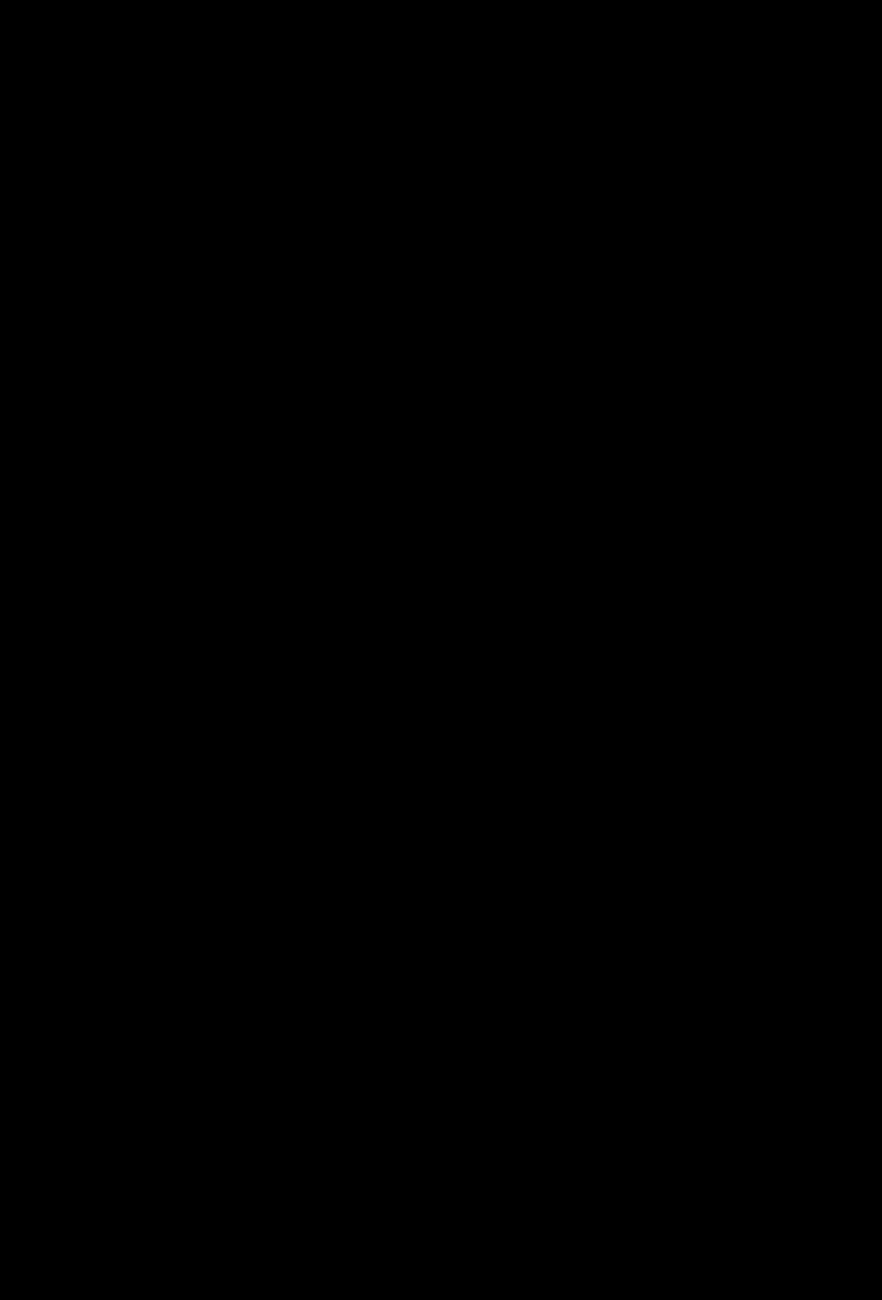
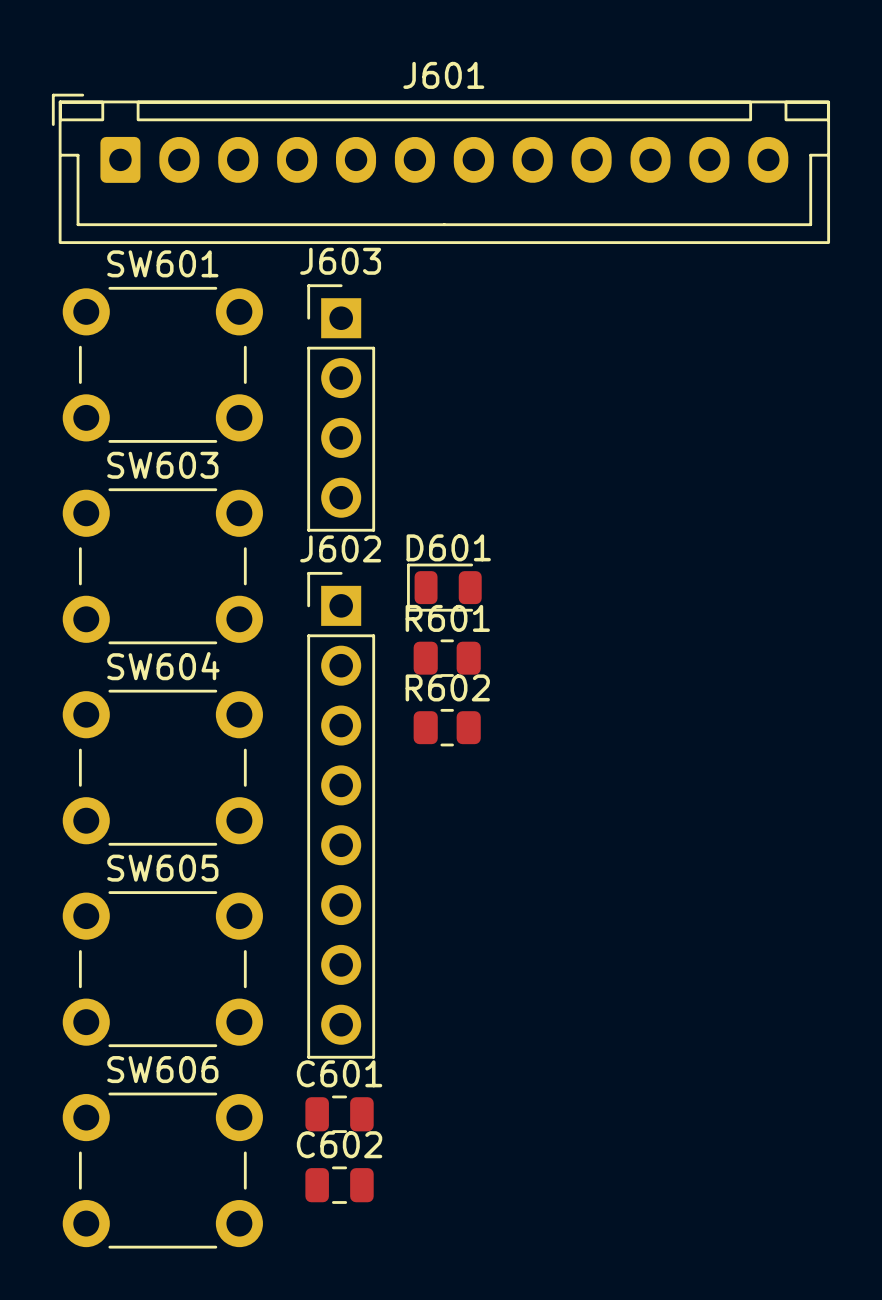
J601: none -> (440, 168)
SW601: none -> (162, 364)
J603: none -> (341, 407)
SW603: none -> (162, 566)
D601: none -> (444, 587)
R601: none -> (447, 658)
R602: none -> (447, 727)
SW604: none -> (162, 767)
J602: none -> (341, 815)
SW605: none -> (162, 969)
C601: none -> (339, 1114)
SW606: none -> (162, 1170)
C602: none -> (339, 1185)

